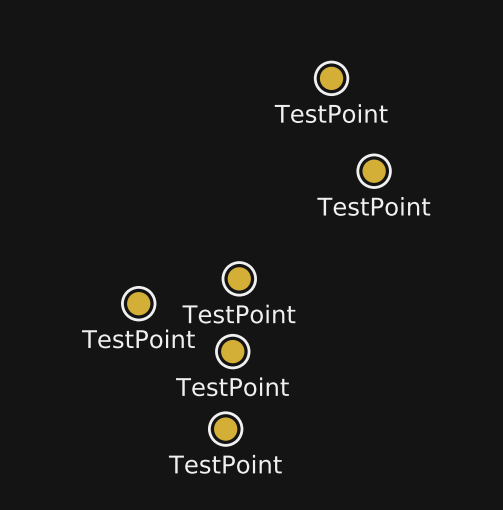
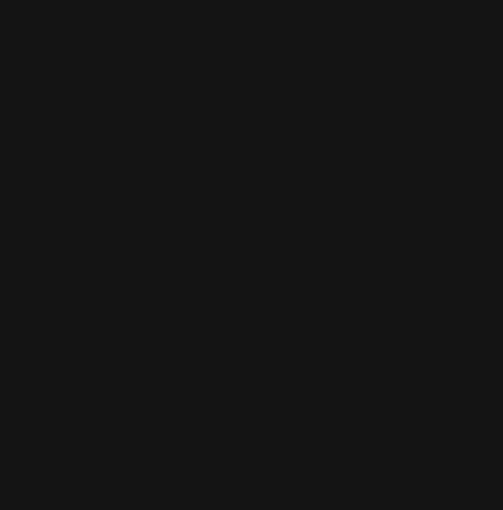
part: TestPoint (331, 78) -> none
part: TestPoint (374, 171) -> none
part: TestPoint (239, 278) -> none
part: TestPoint (138, 303) -> none
part: TestPoint (232, 351) -> none
part: TestPoint (225, 429) -> none

